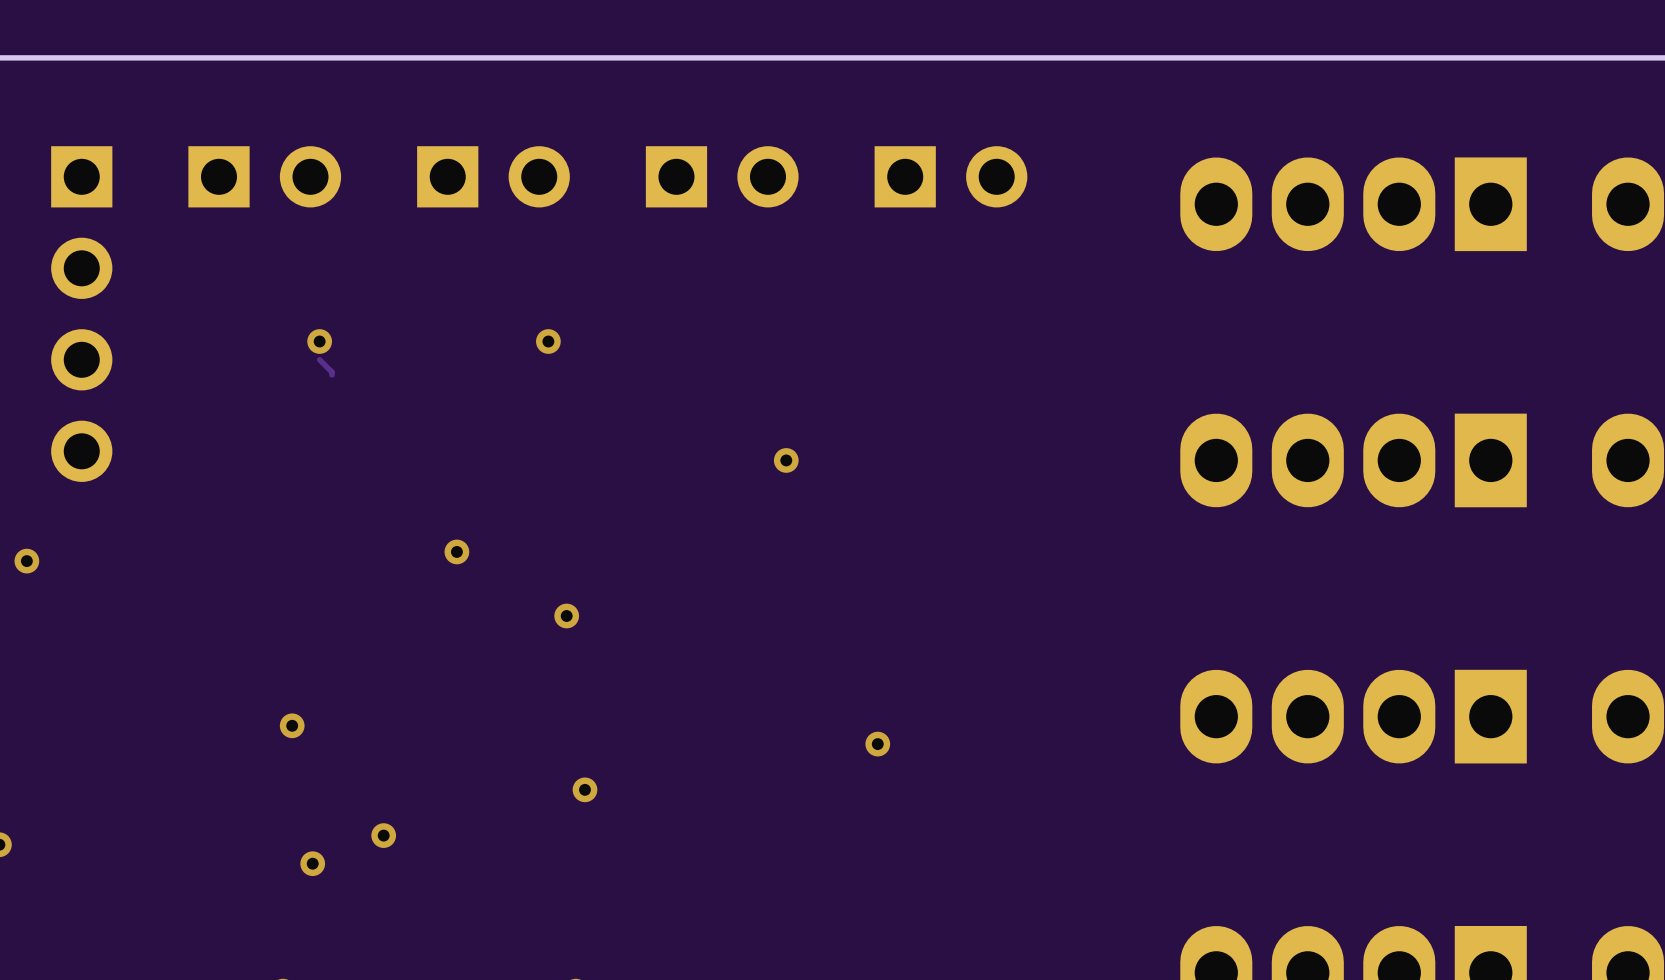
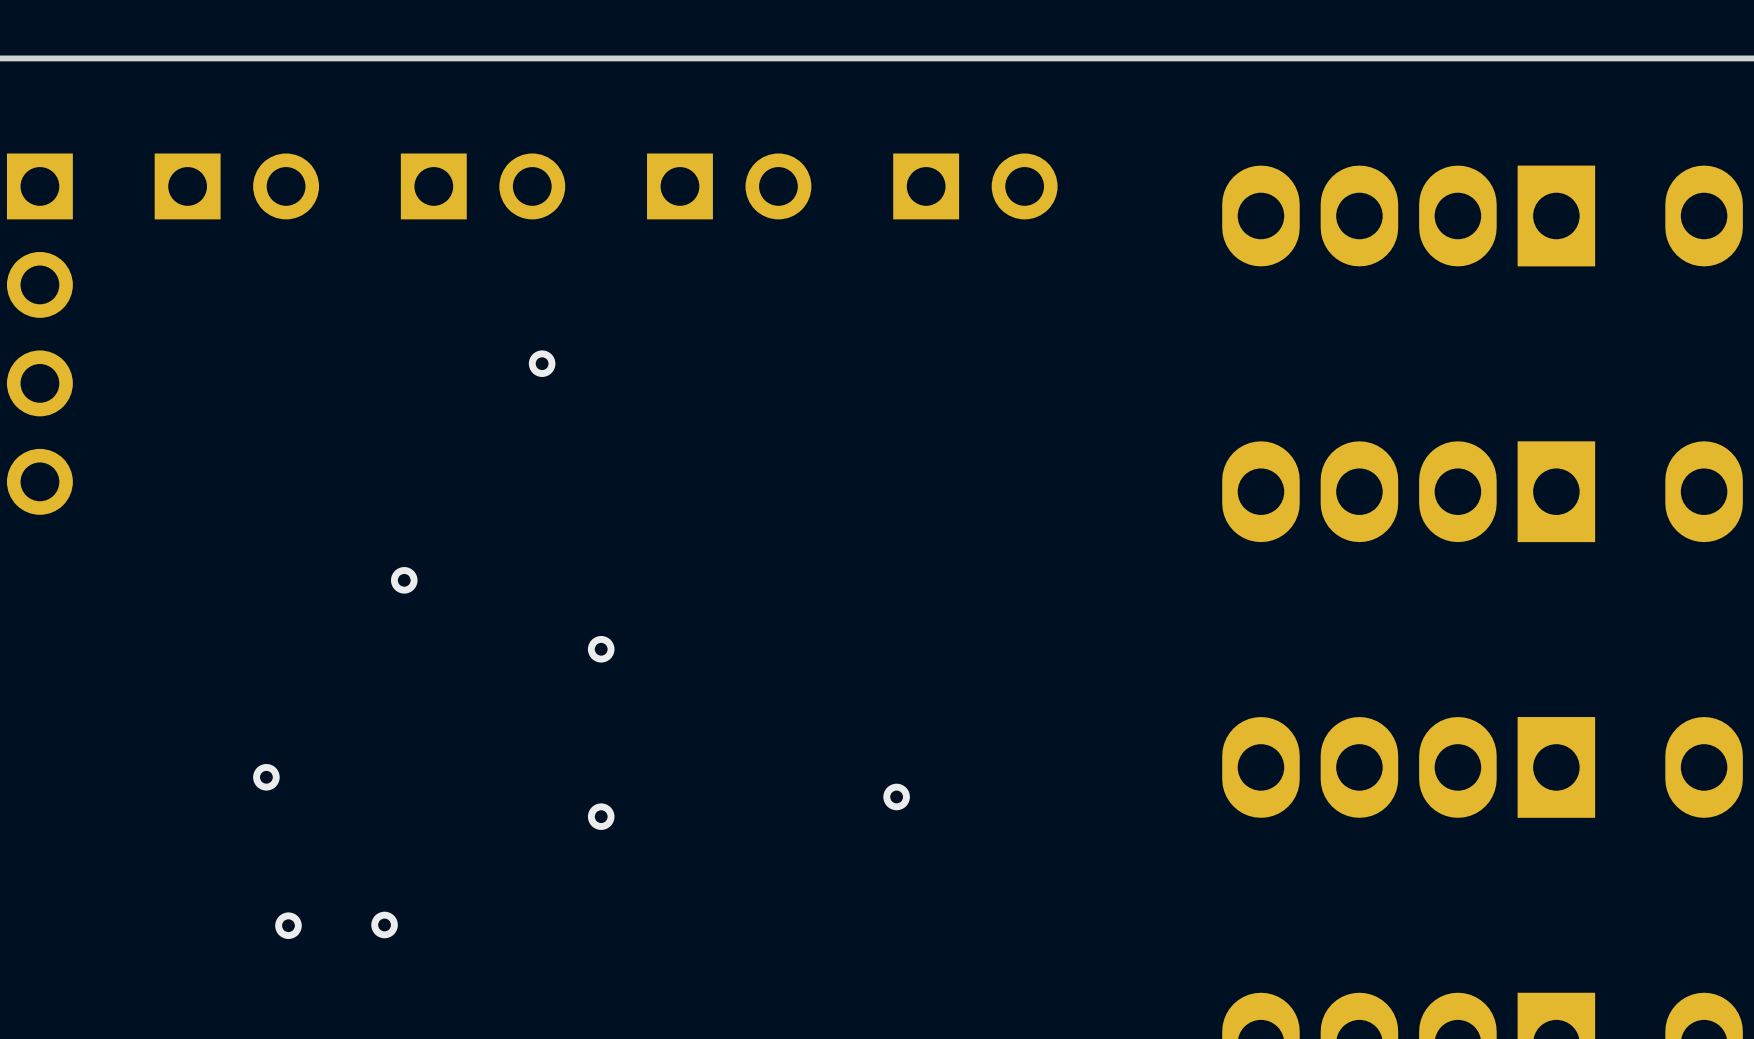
via: (319, 341) -> none
track: (319, 359) (332, 372) (332, 374) -> none
via: (786, 460) -> none
via position: (456, 551) -> (404, 580)
via position: (566, 616) -> (601, 649)
via position: (584, 789) -> (601, 816)
via position: (383, 835) -> (384, 924)

